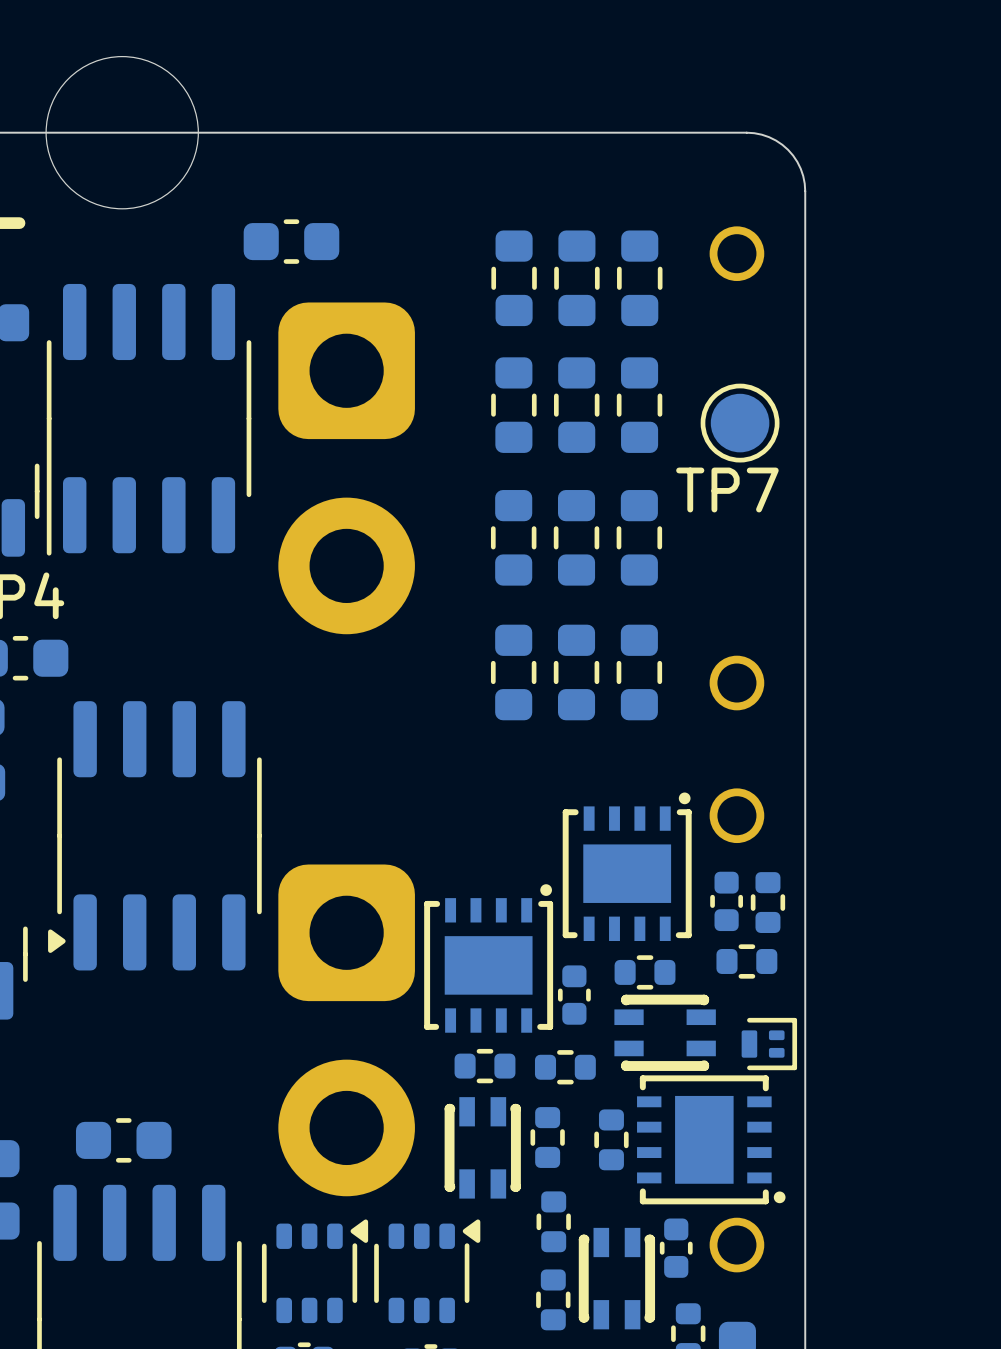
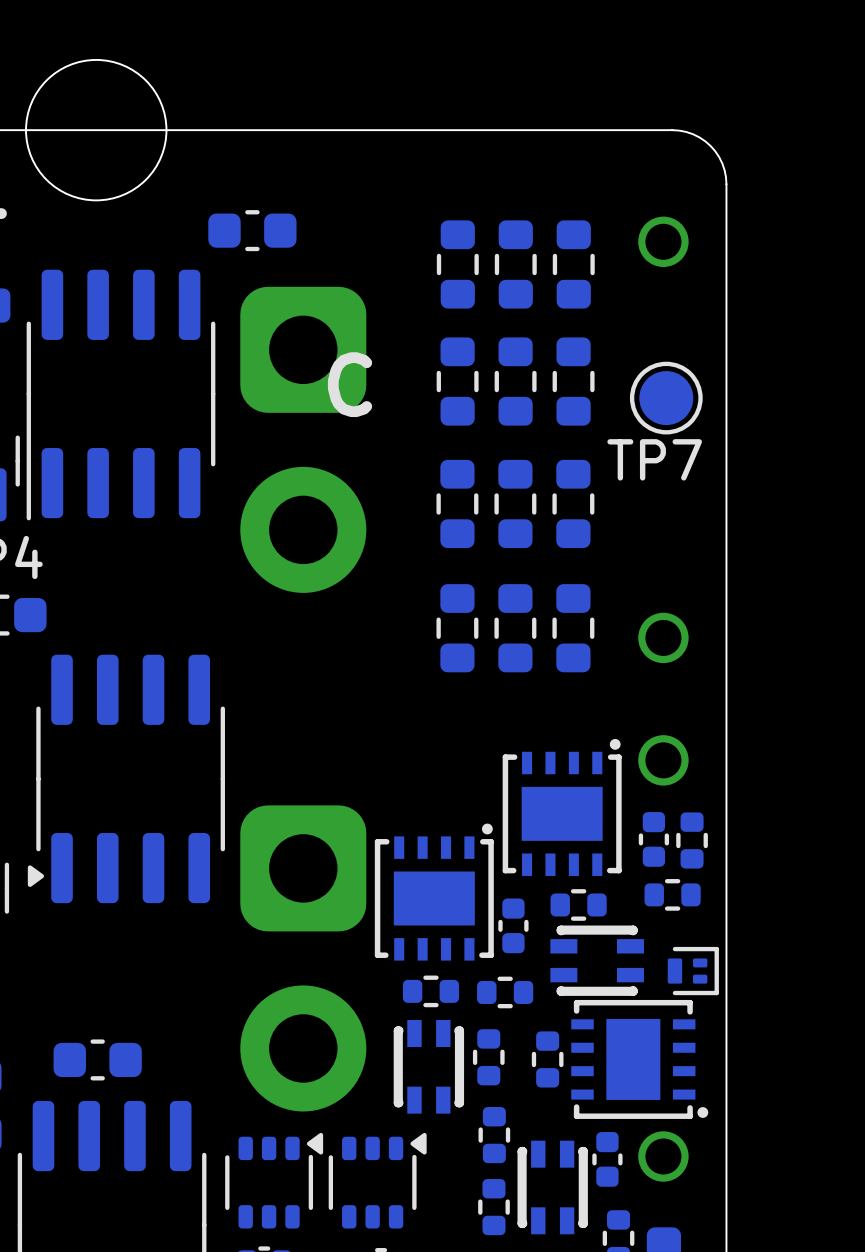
text: none -> C (350, 384)

